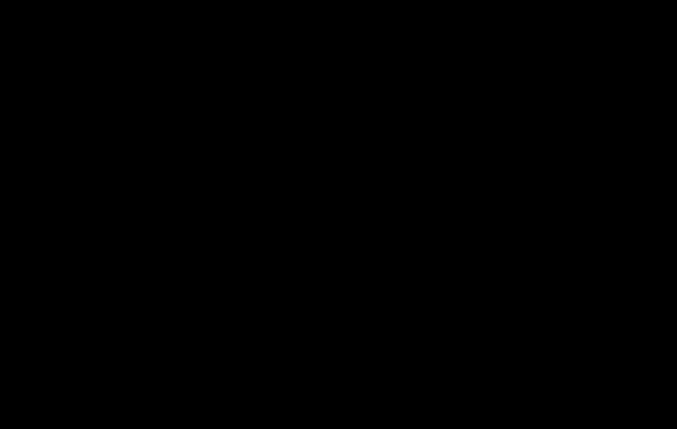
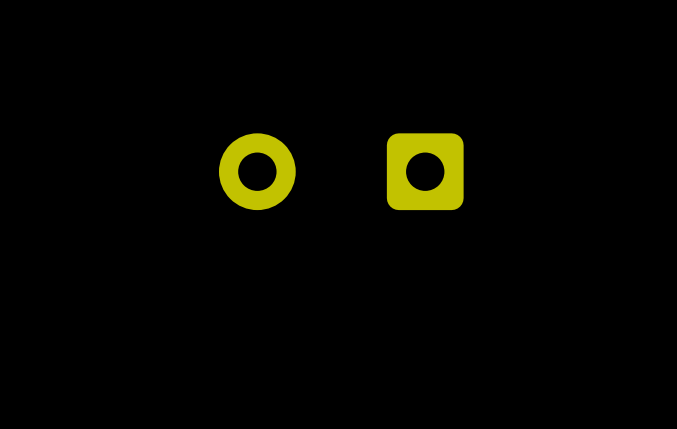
part: none -> (341, 171)

